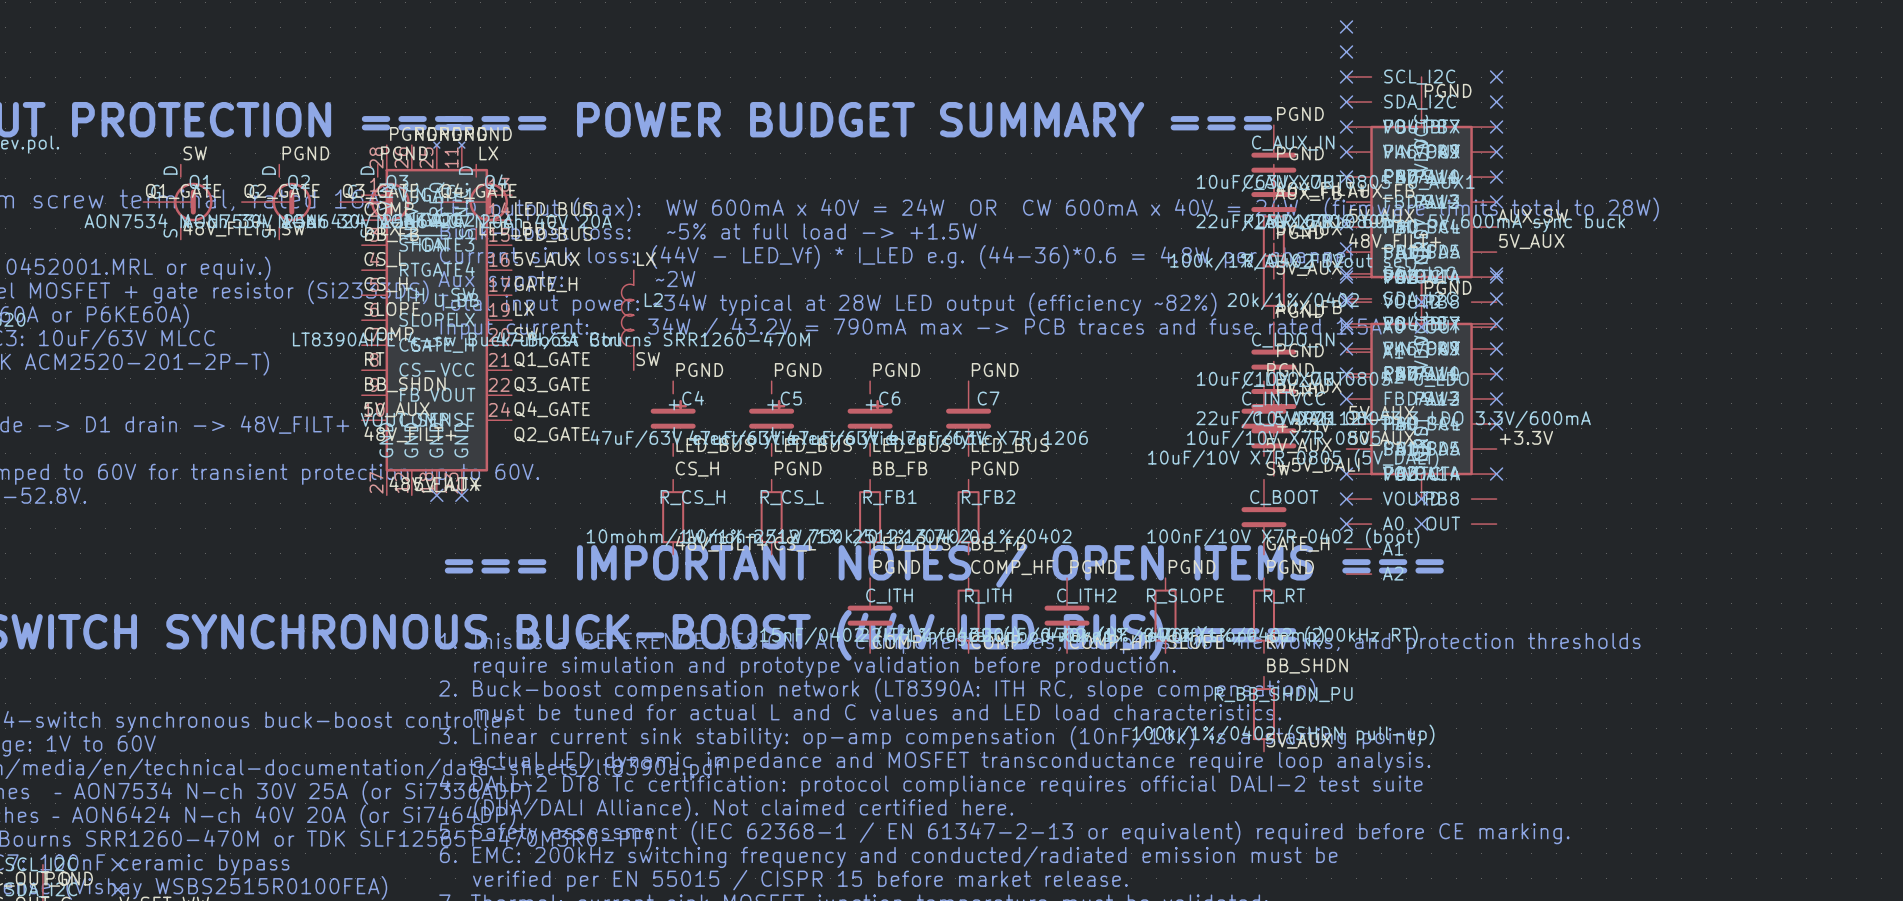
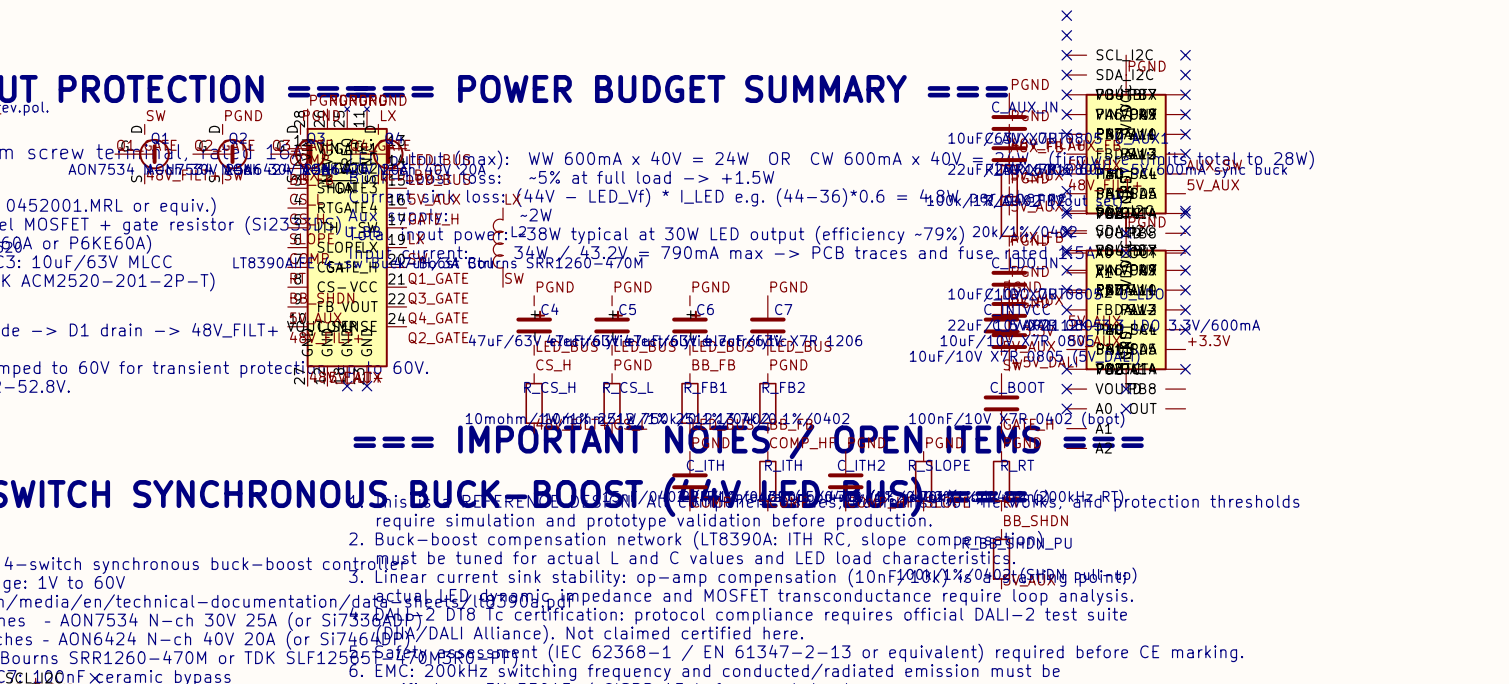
text: Total input power: ~34W typical at 28W LED output (efficiency ~82%) (827, 304) -> Total input power: ~38W typical at 30W LED output (efficiency ~79%) (656, 235)

